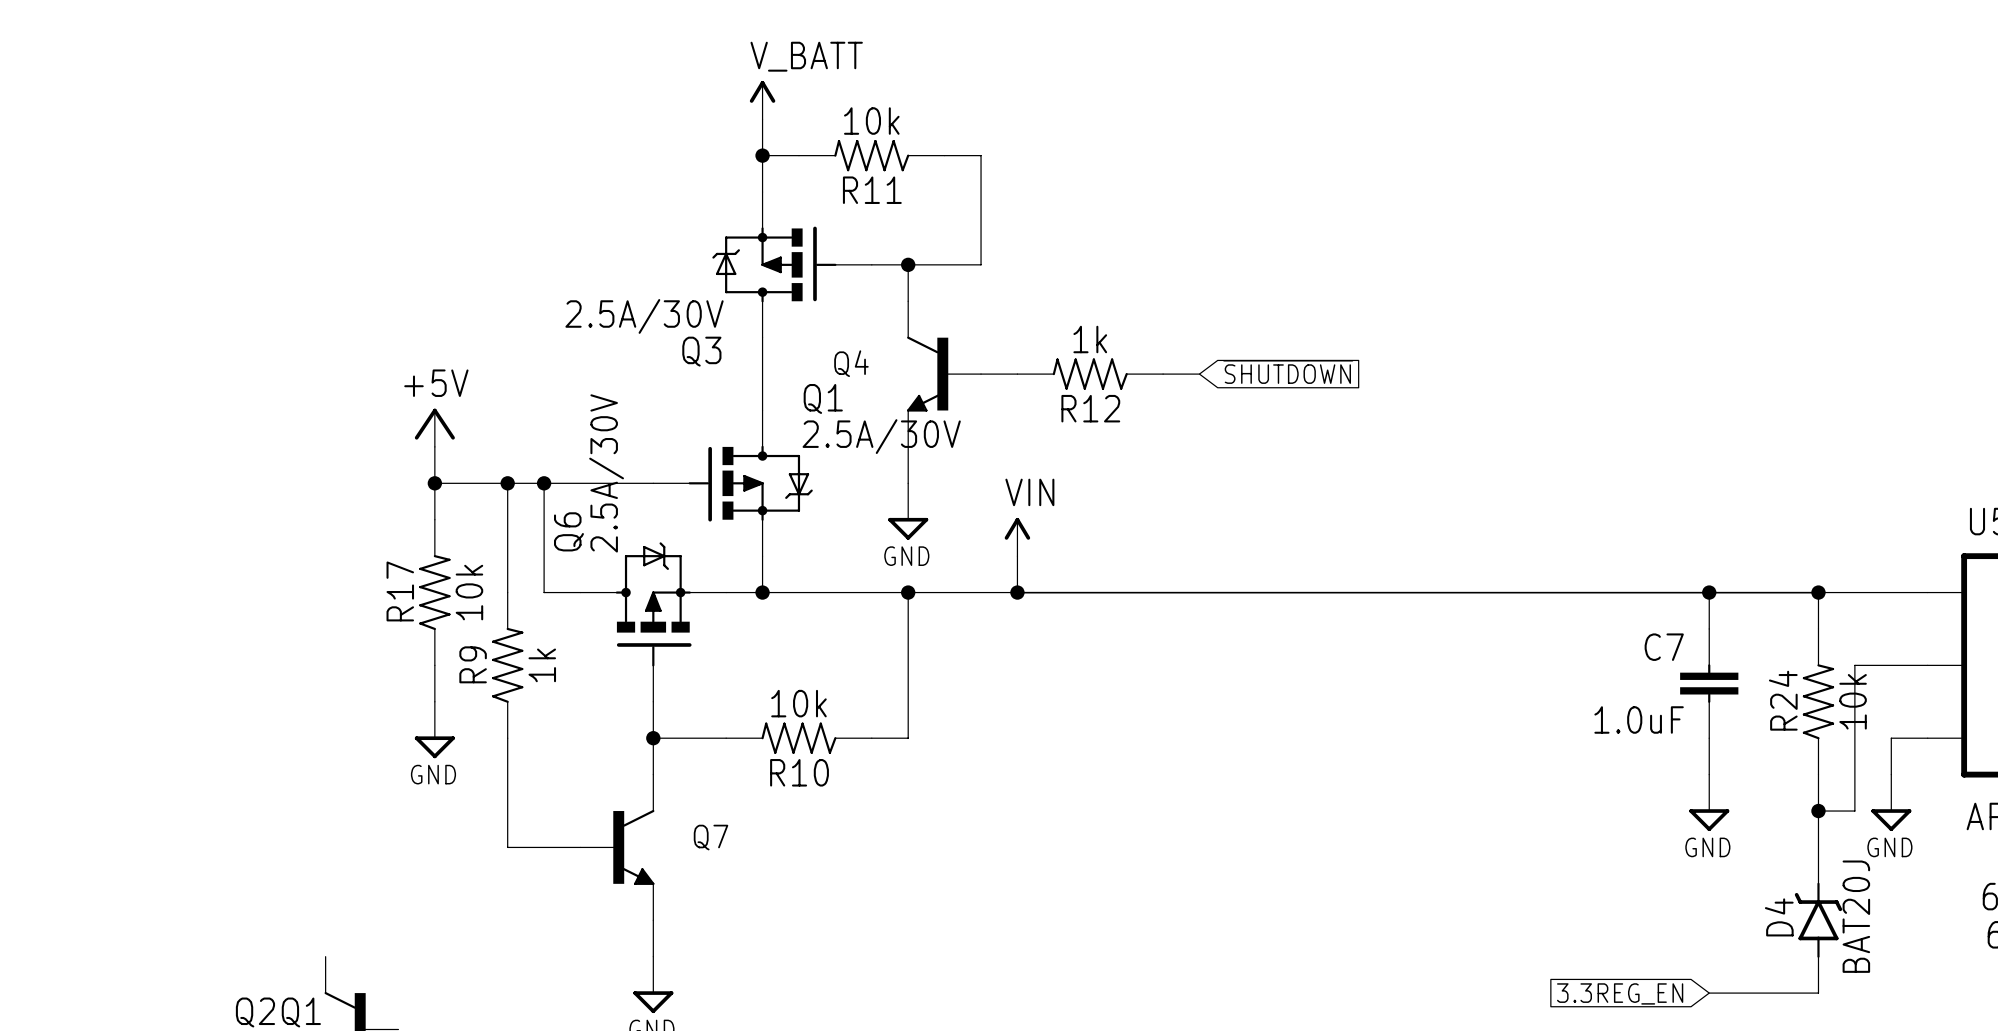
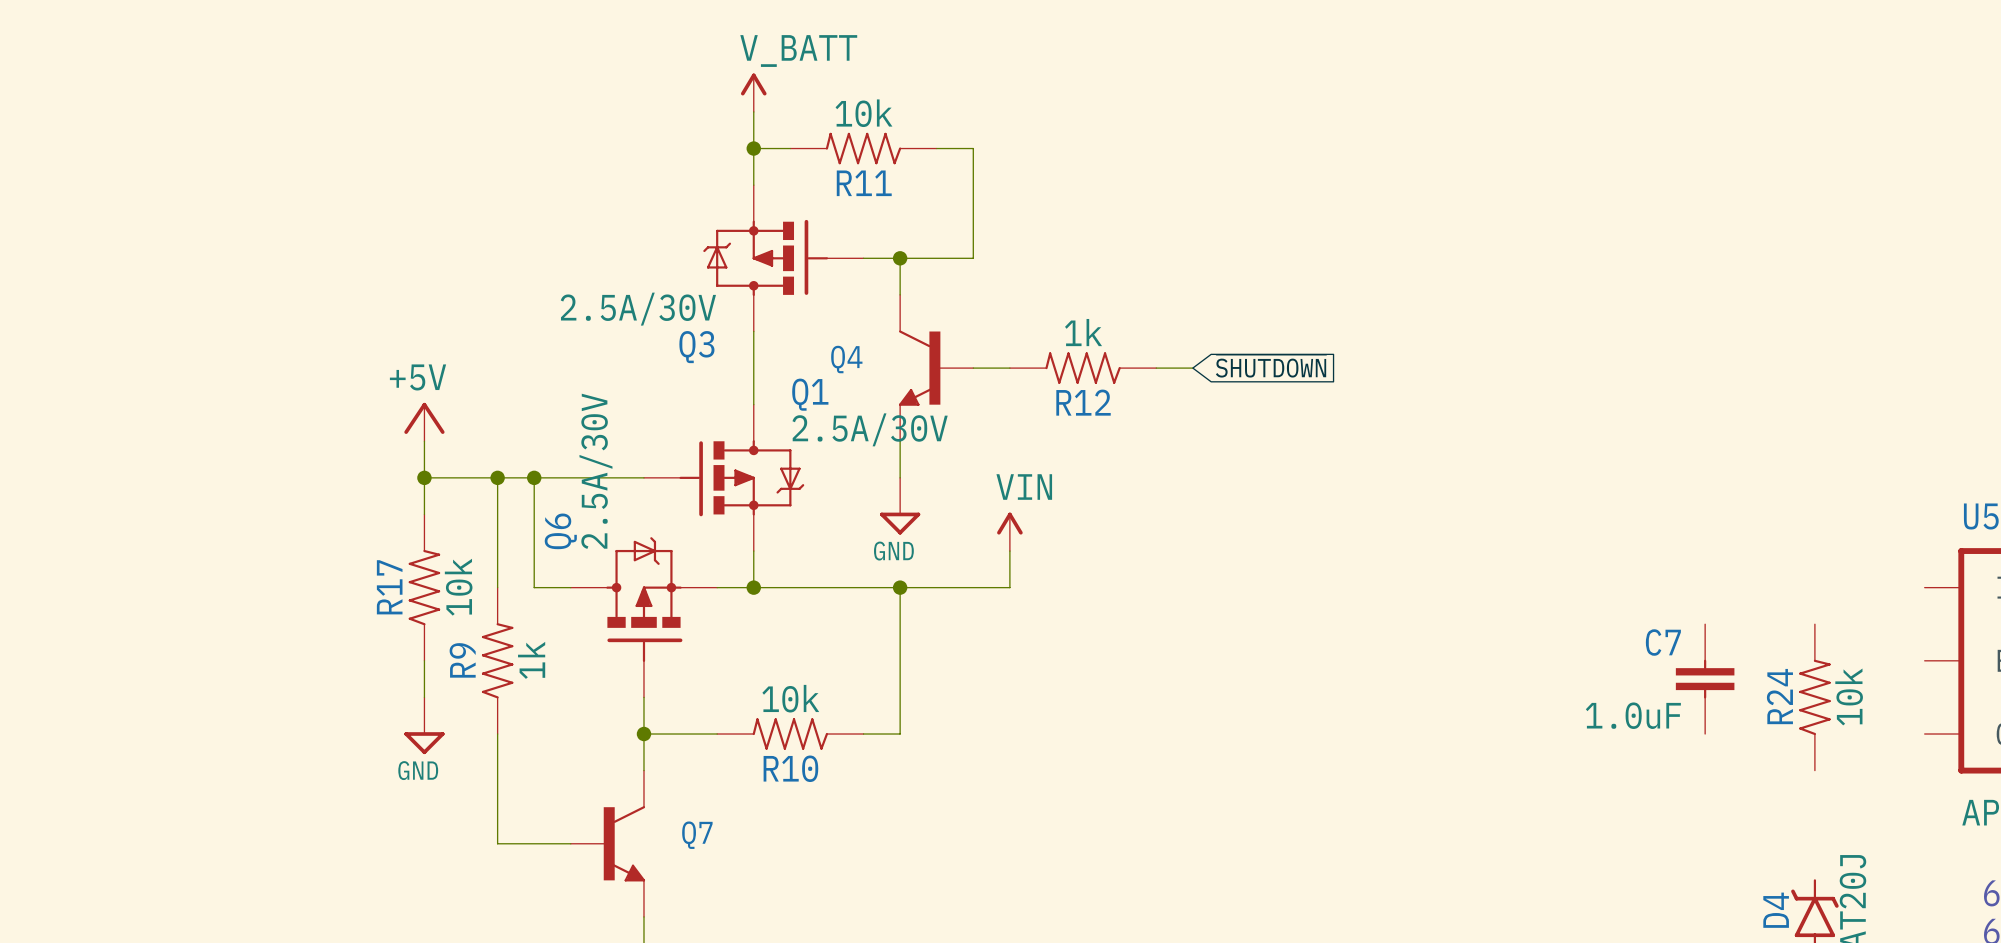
wire: (1017, 592) (1927, 592) -> none
junction: (1017, 592) -> none
wire: (1709, 592) (1709, 628) -> none
junction: (1709, 592) -> none
wire: (1818, 592) (1818, 628) -> none
junction: (1818, 592) -> none
wire: (1927, 665) (1854, 665) (1854, 811) (1818, 811) -> none
wire: (1709, 738) (1709, 774) -> none
wire: (1927, 738) (1891, 738) (1891, 774) -> none
wire: (1818, 774) (1818, 883) -> none
power symbol: GND (1709, 802) -> none
power symbol: GND (1891, 802) -> none
junction: (1818, 811) -> none

